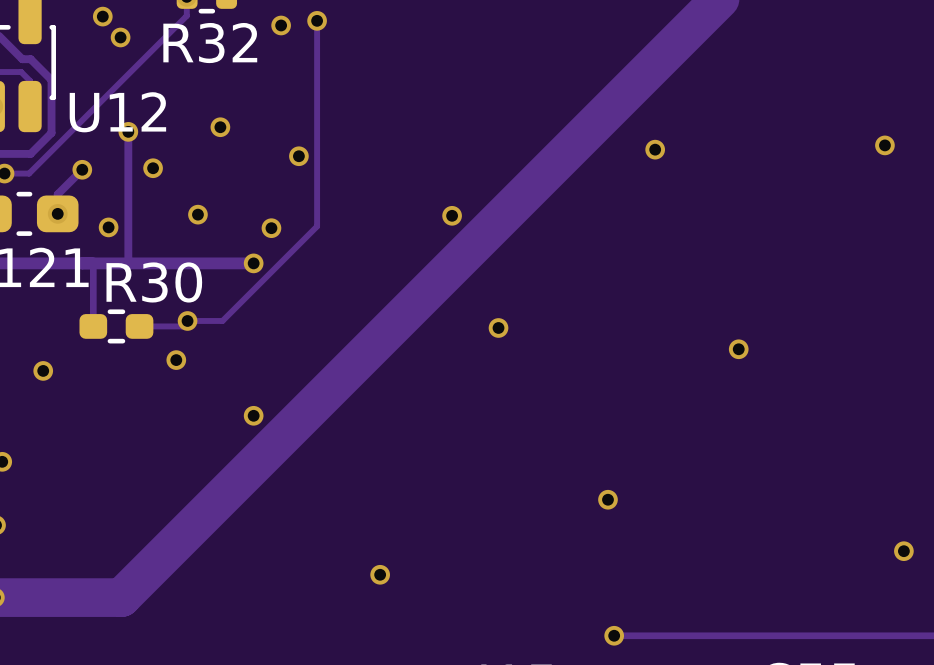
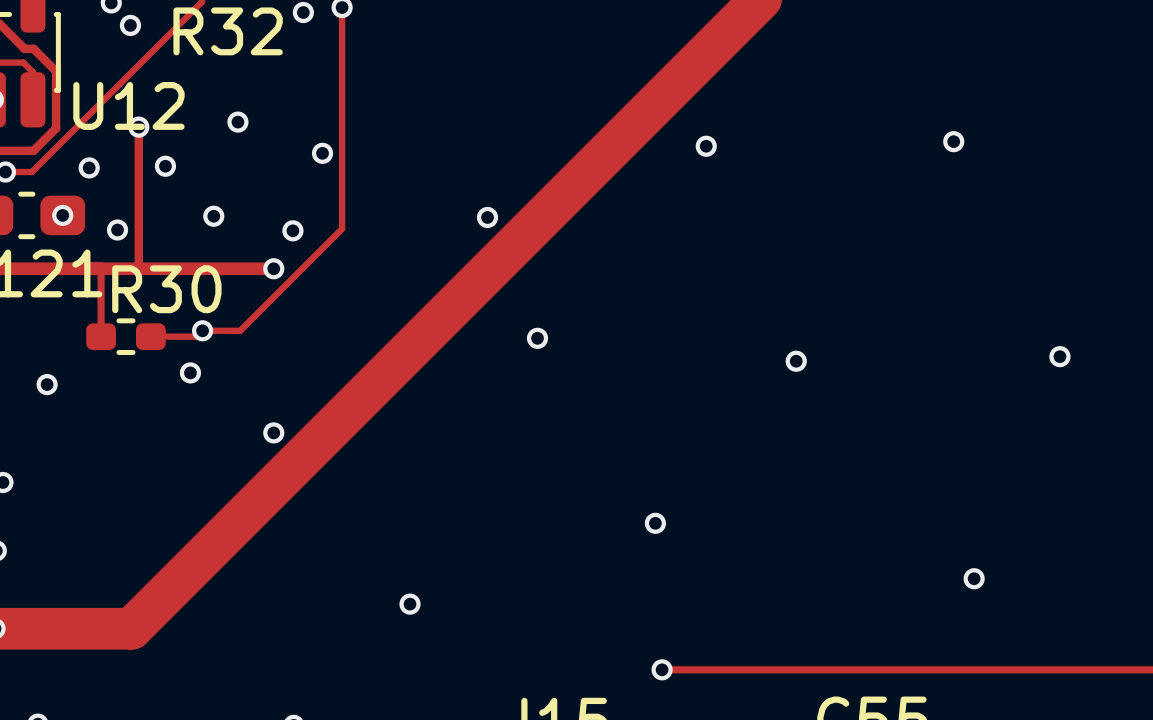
track: (82, 169) (57, 194) (57, 213) -> none

